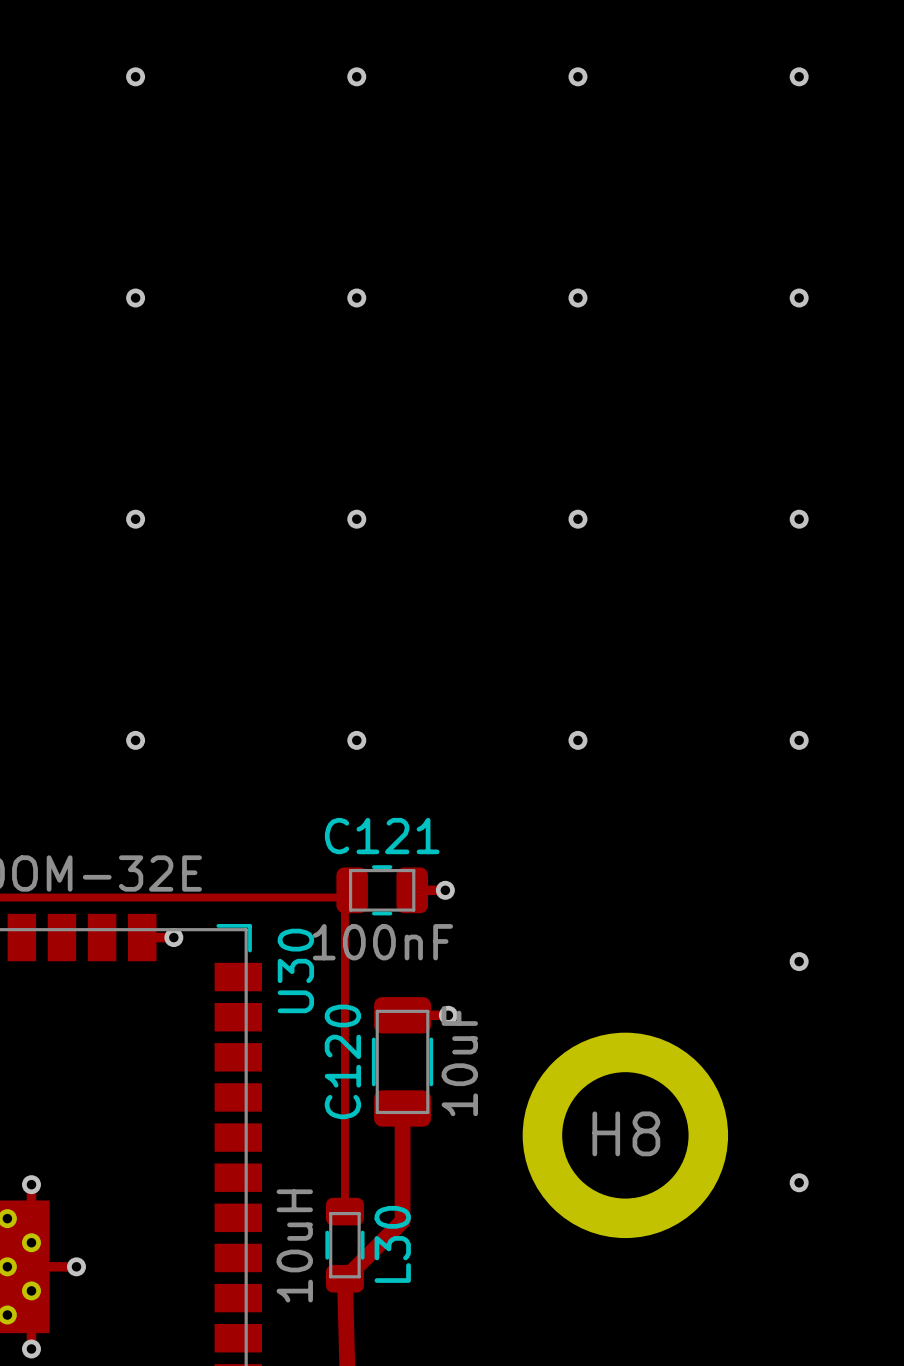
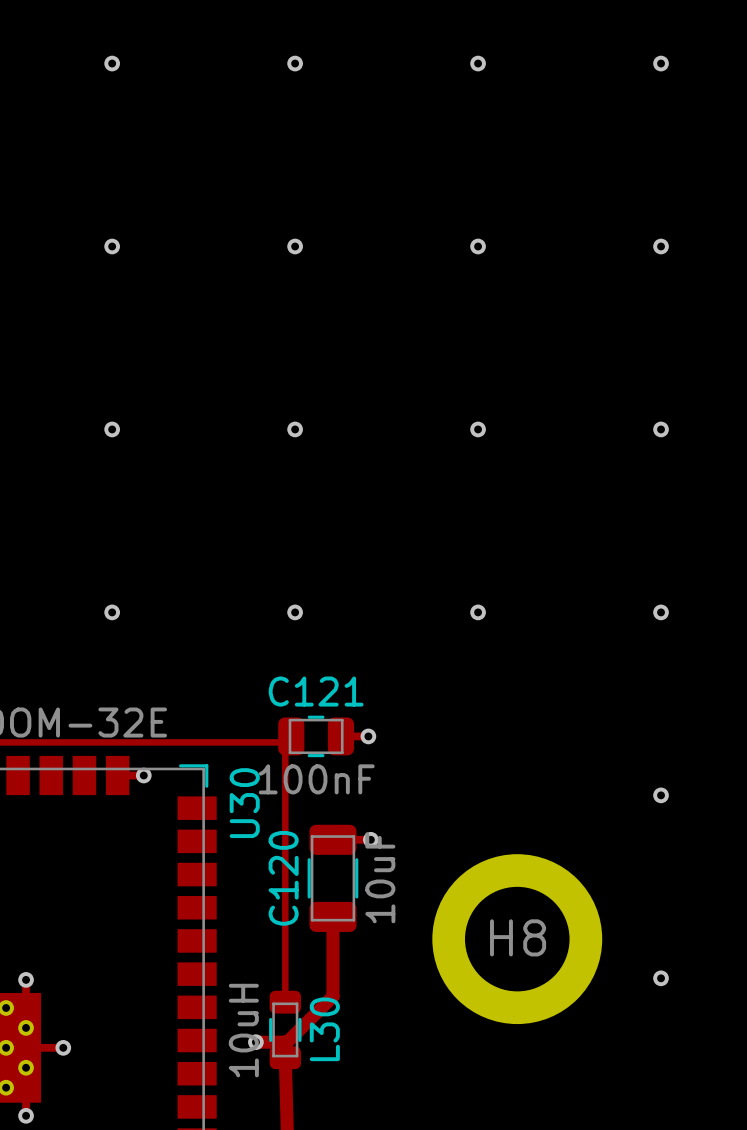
top track: (402, 1204) (402, 1221) (344, 1278) -> (332, 996) (287, 1042) (255, 1042)
via: none -> (255, 1042)

